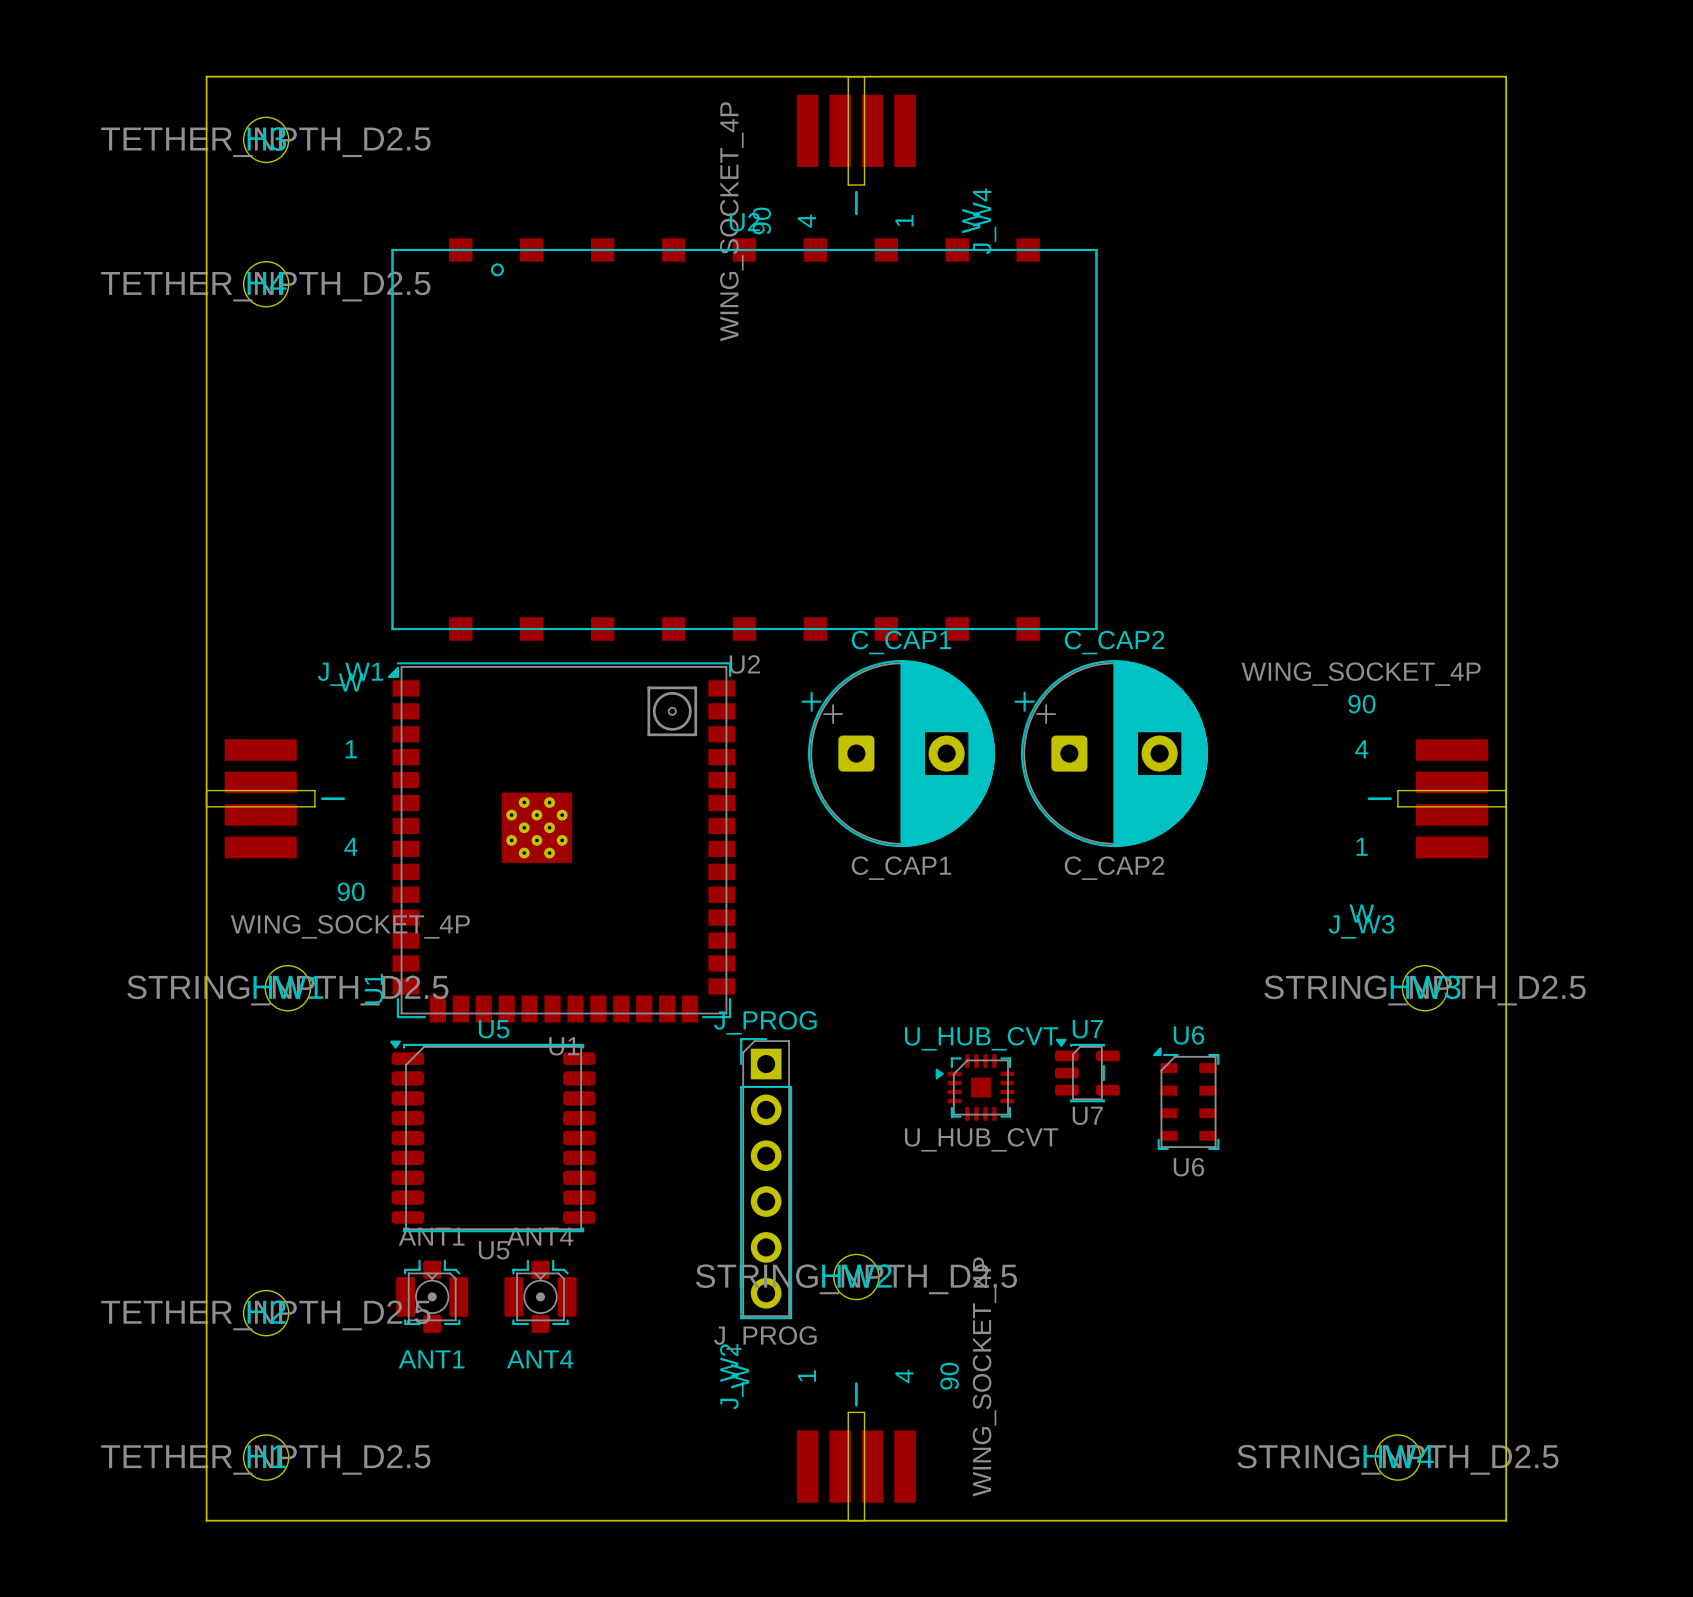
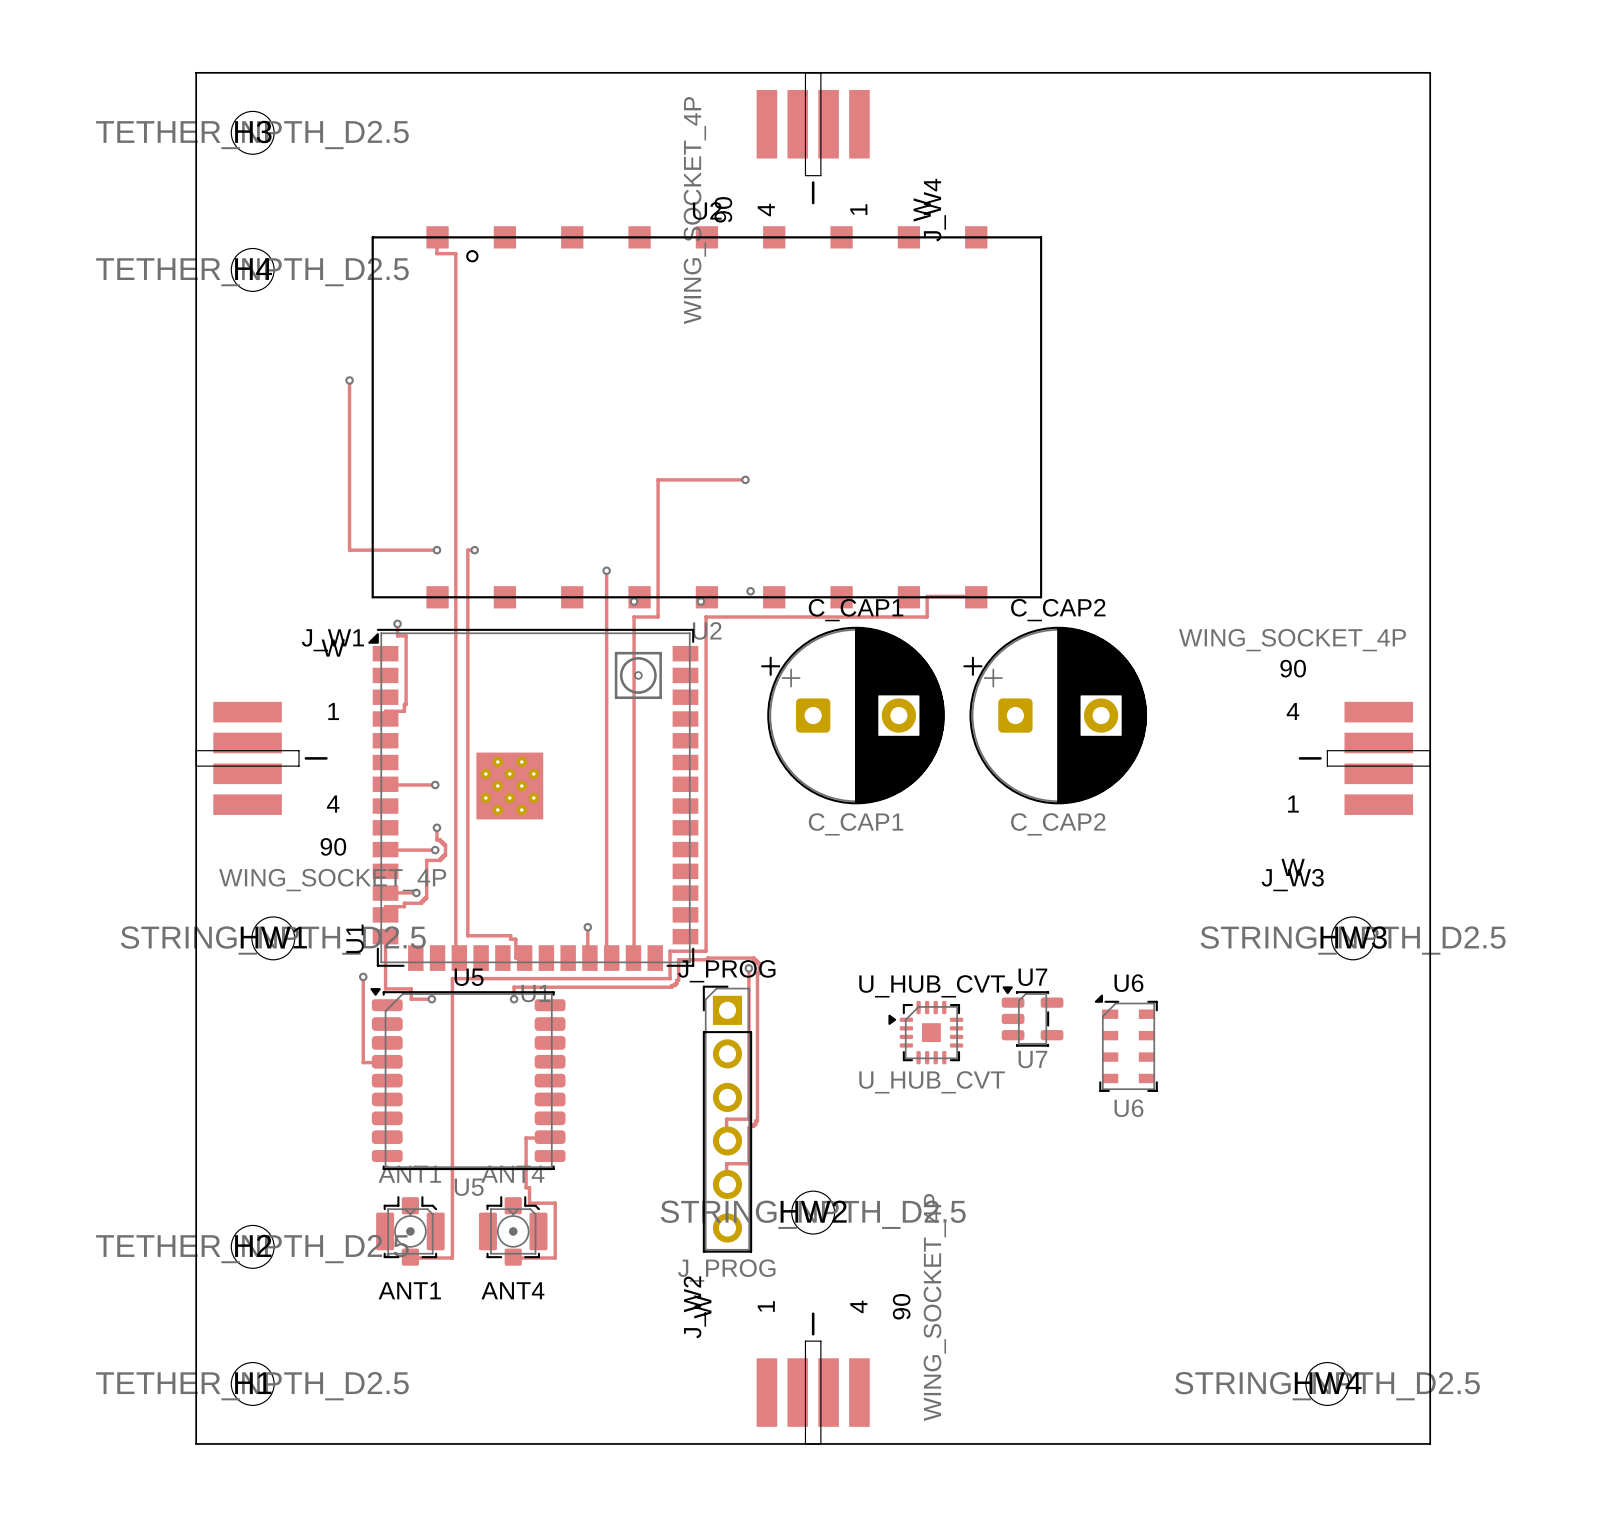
track: none -> (436, 236) (436, 253) (455, 253) (455, 958) (459, 958)
track: none -> (349, 380) (349, 550) (436, 550)
via: none -> (349, 380)
track: none -> (745, 479) (658, 479) (658, 617) (634, 617) (634, 958)
via: none -> (745, 479)
via: none -> (436, 550)
track: none -> (474, 550) (467, 550) (467, 935) (510, 935) (510, 939) (515, 939) (515, 958) (524, 958)
via: none -> (474, 550)
track: none -> (606, 570) (606, 958) (611, 958)
via: none -> (606, 570)
via: none -> (750, 591)
track: none -> (976, 596) (927, 596) (927, 617) (706, 617) (706, 951) (670, 951) (670, 978) (452, 978) (452, 1258) (411, 1258) (411, 1256)
via: none -> (634, 601)
via: none -> (700, 601)
track: none -> (397, 623) (397, 635) (406, 635) (406, 704) (404, 704) (404, 711) (385, 711) (385, 719)
via: none -> (397, 623)
track: none -> (385, 784) (435, 784)
via: none -> (435, 784)
track: none -> (436, 827) (436, 839) (440, 839) (445, 844) (445, 855) (440, 860) (426, 860) (426, 898) (421, 903) (404, 903) (404, 906) (385, 906) (385, 915)
via: none -> (436, 827)
track: none -> (385, 850) (435, 850)
via: none -> (435, 850)
track: none -> (385, 892) (416, 892)
via: none -> (416, 892)
track: none -> (587, 927) (587, 958) (589, 958)
via: none -> (587, 927)
track: none -> (385, 935) (385, 988) (411, 988) (411, 999) (431, 999)
track: none -> (748, 968) (748, 1119) (726, 1119) (726, 1141)
via: none -> (748, 968)
track: none -> (363, 976) (363, 1062) (387, 1062)
via: none -> (363, 976)
via: none -> (431, 999)
track: none -> (514, 999) (514, 987) (671, 987) (678, 980) (678, 959) (754, 958) (759, 963) (759, 973) (757, 973) (757, 1120) (754, 1126) (748, 1127) (748, 1163) (726, 1163) (726, 1184)
via: none -> (514, 999)
track: none -> (550, 1138) (526, 1138) (526, 1187) (529, 1187) (529, 1203) (555, 1203) (555, 1258) (514, 1258) (514, 1256)

